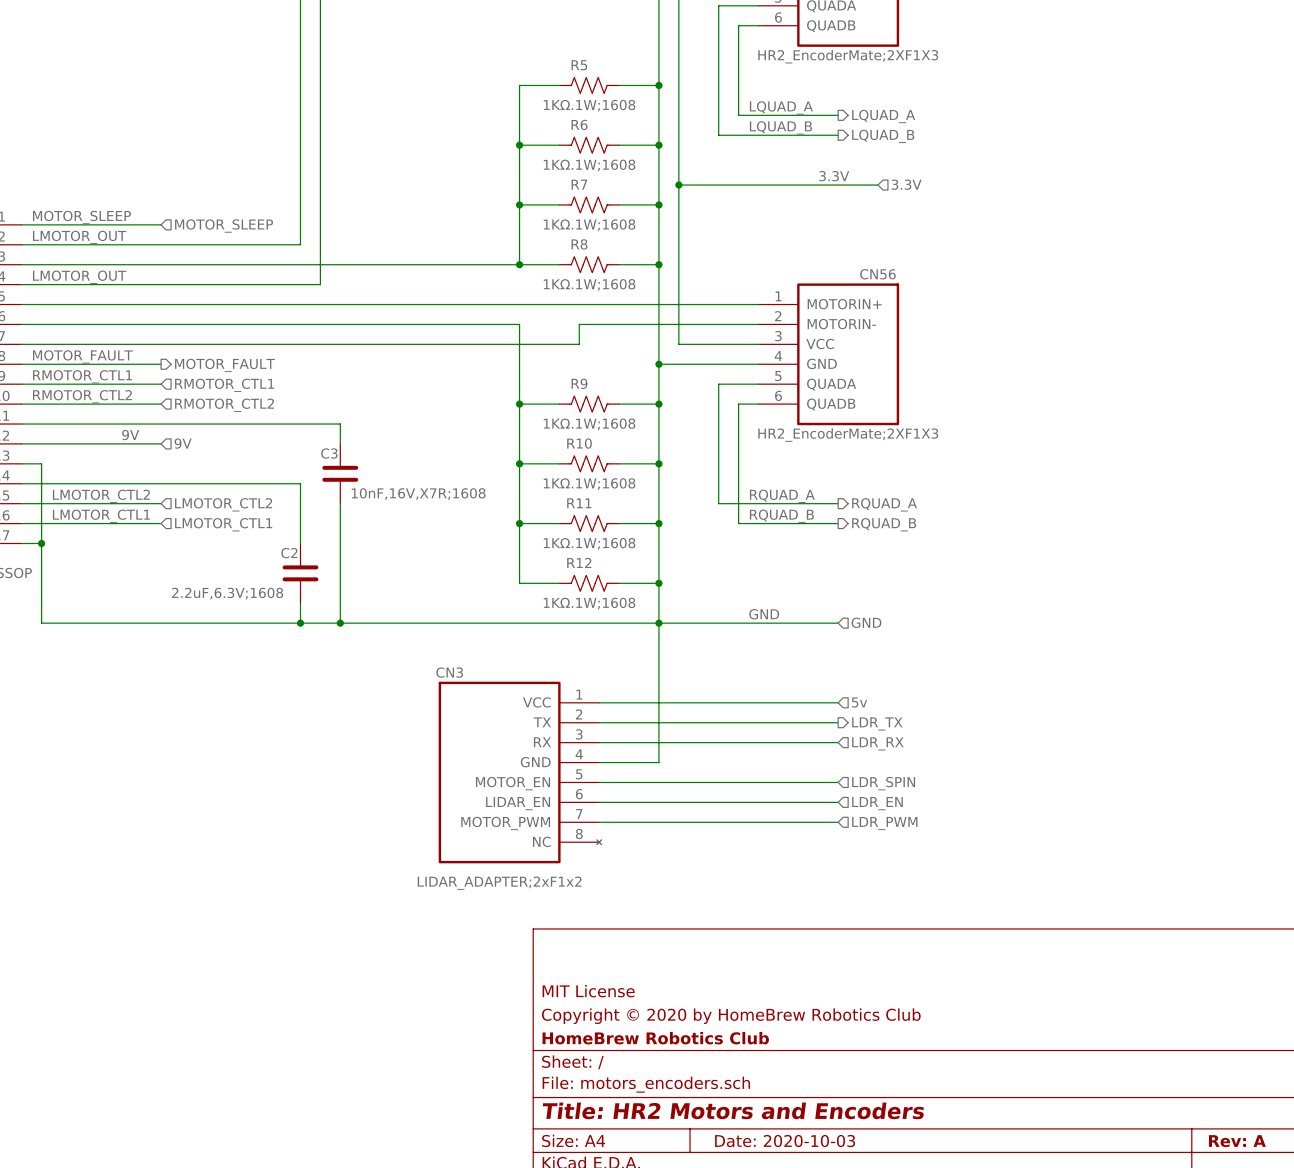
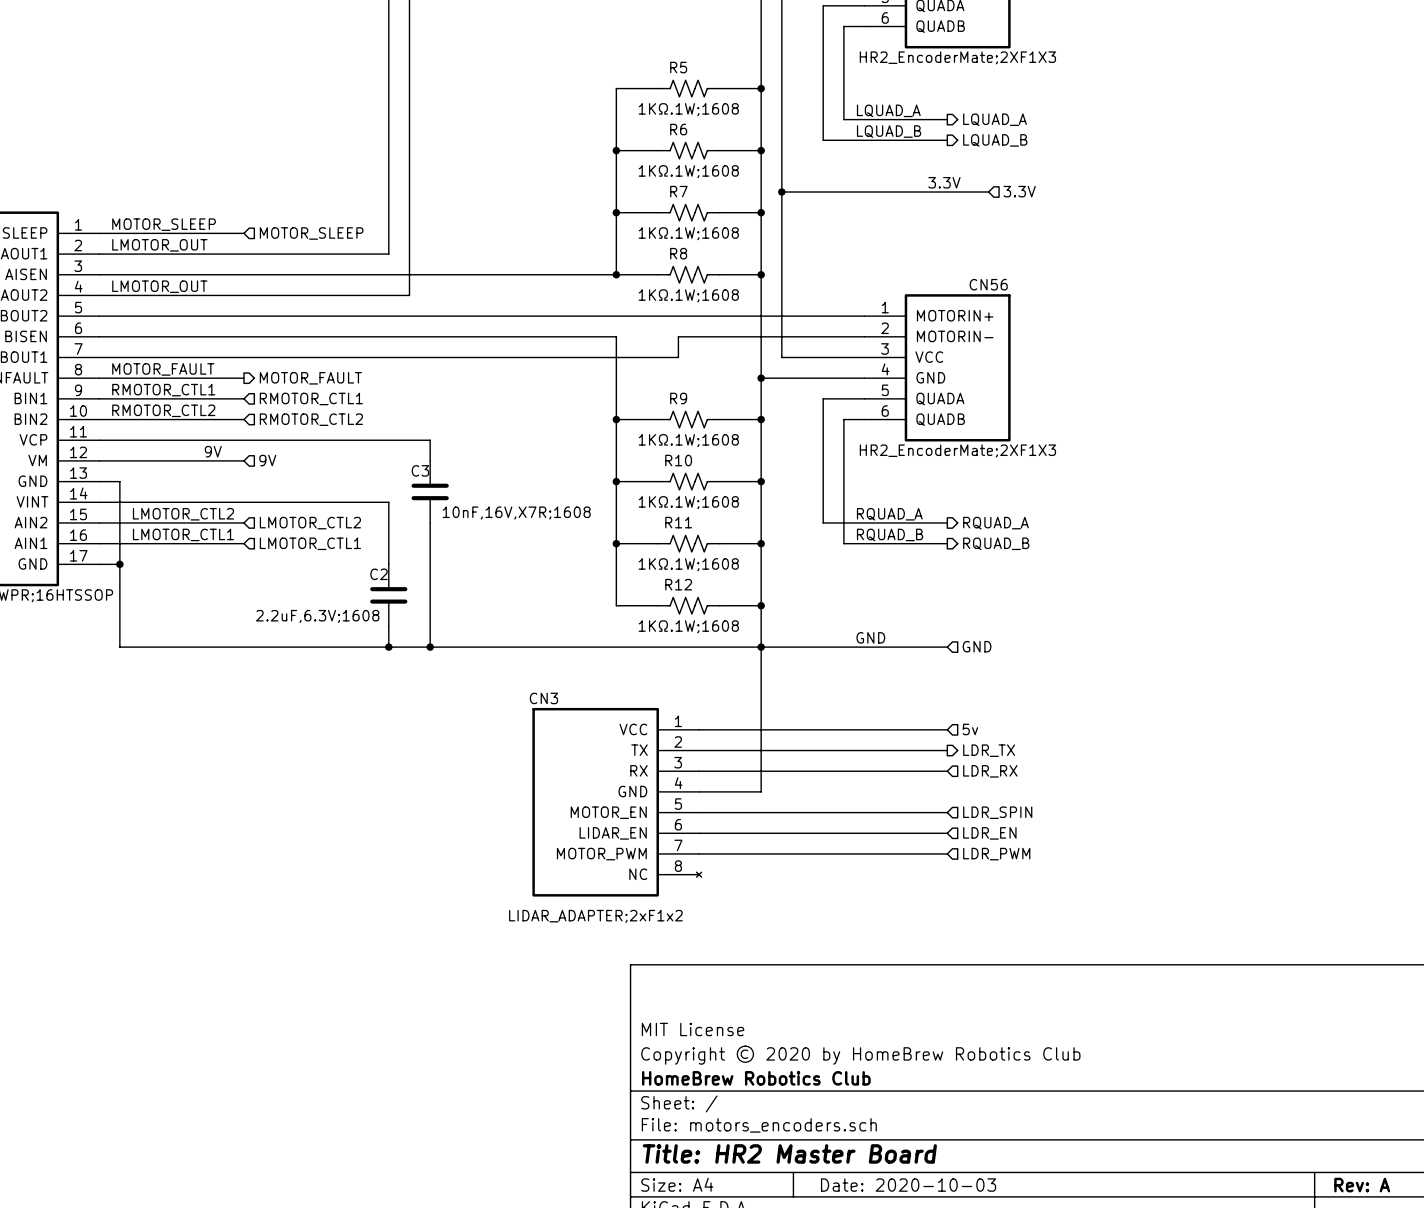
title block: Title: HR2 Motors and Encoders (733, 1110) -> Title: HR2 Master Board (789, 1153)

